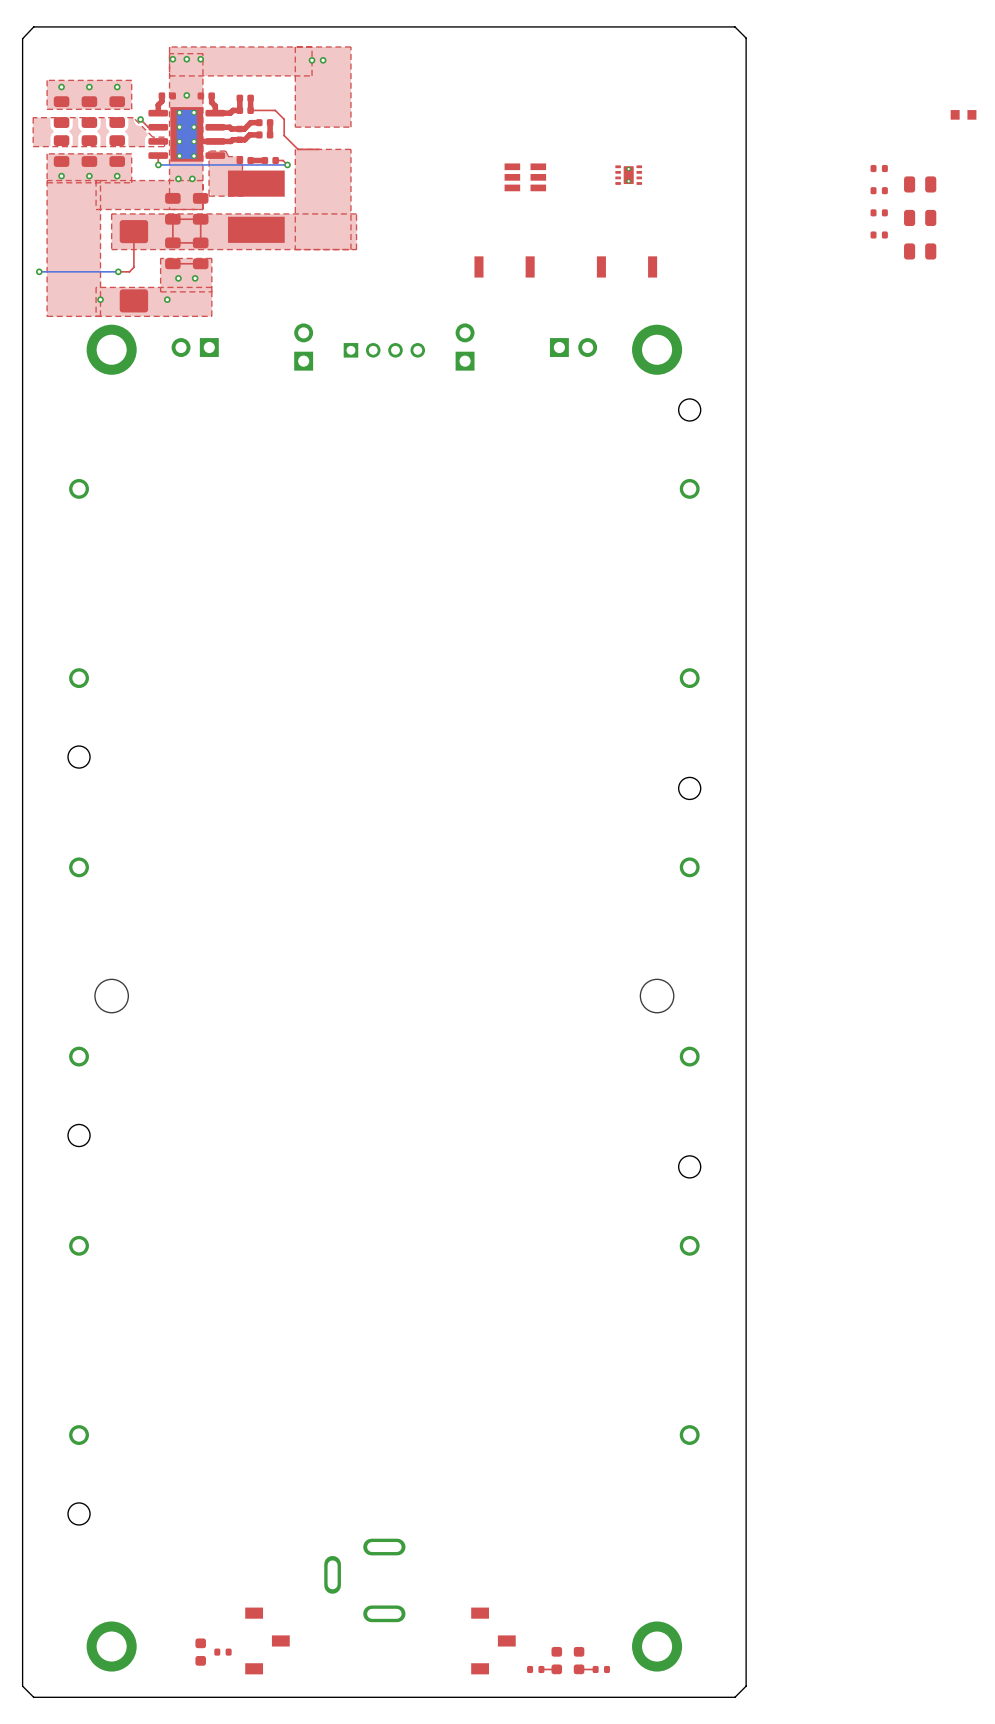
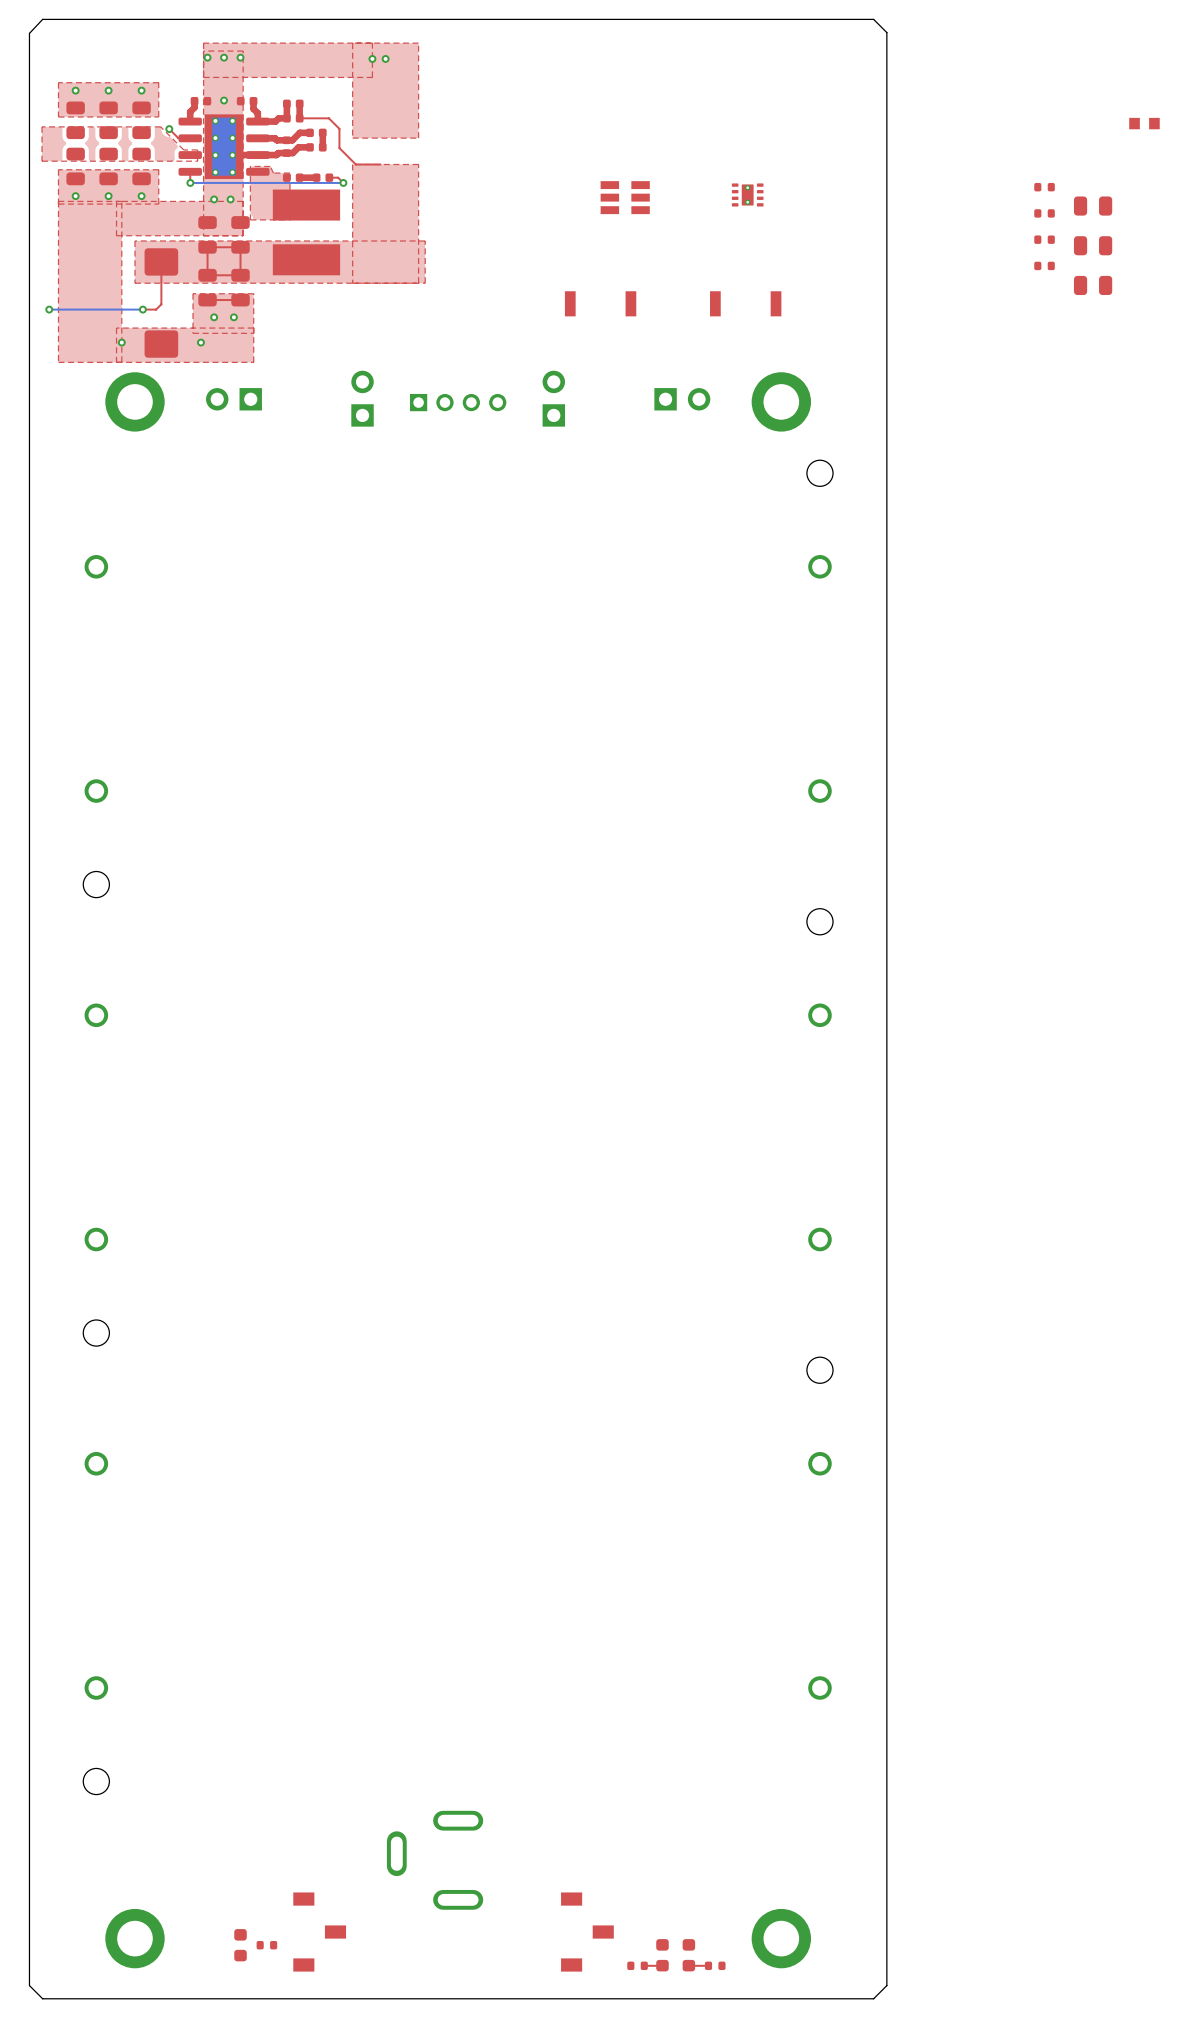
drawing: [94, 978, 130, 1014] -> none
drawing: [639, 978, 675, 1014] -> none

